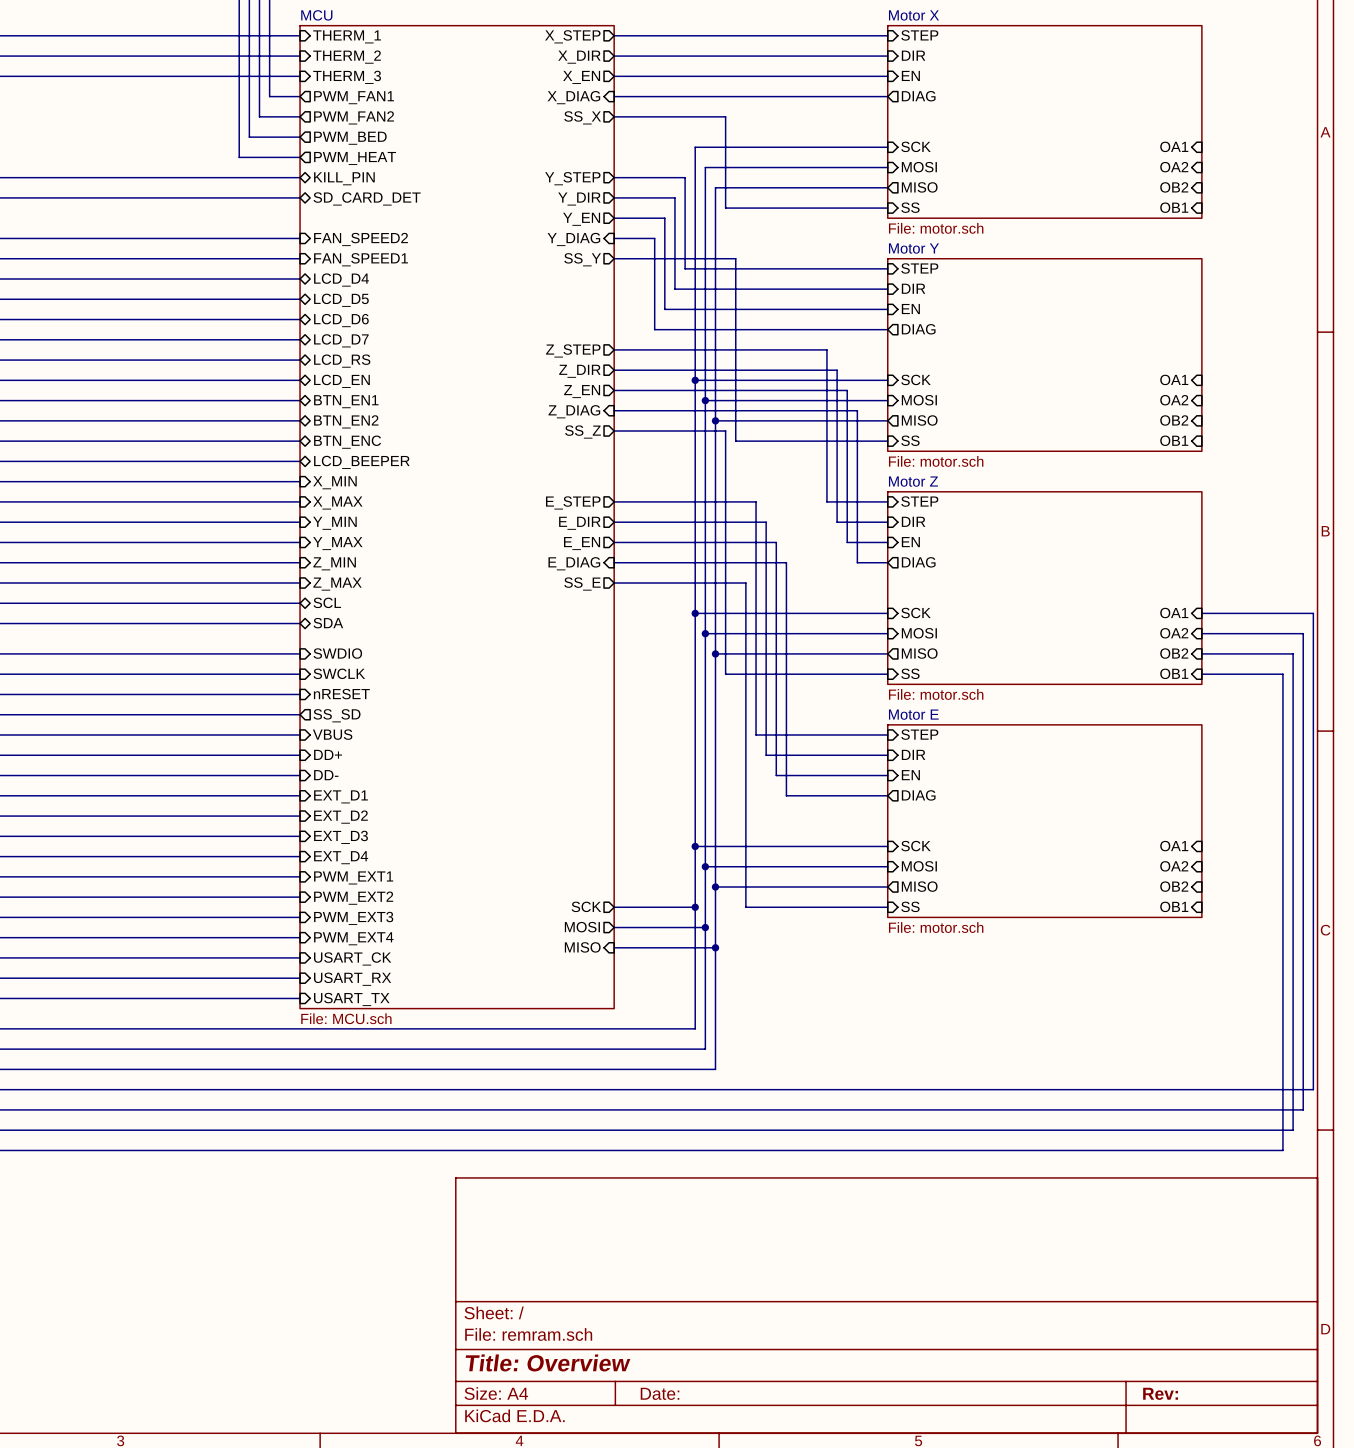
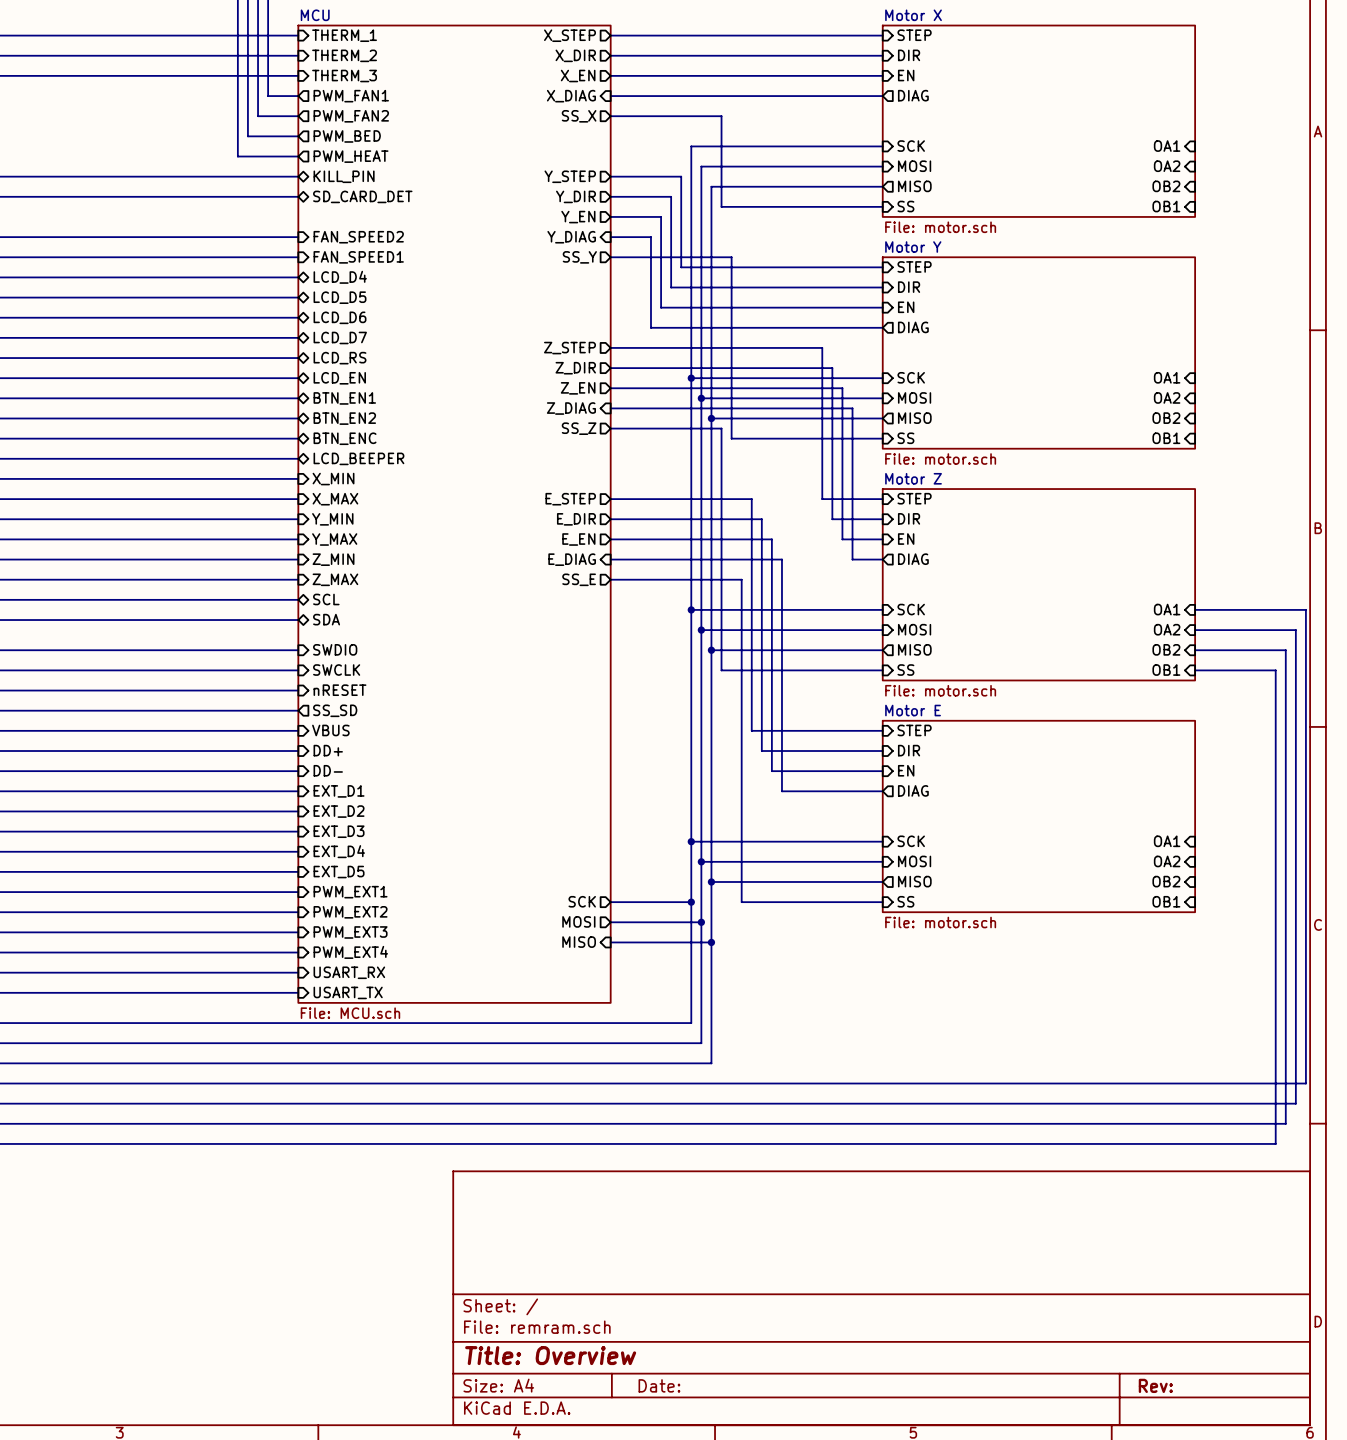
sheet pin: PWM_EXT1 (353, 877) -> EXT_D5 (339, 872)
sheet pin: PWM_EXT2 (353, 898) -> PWM_EXT1 (350, 892)
sheet pin: PWM_EXT3 (353, 918) -> PWM_EXT2 (350, 912)
sheet pin: PWM_EXT4 (353, 938) -> PWM_EXT3 (350, 932)
sheet pin: USART_CK (352, 958) -> PWM_EXT4 (350, 952)

